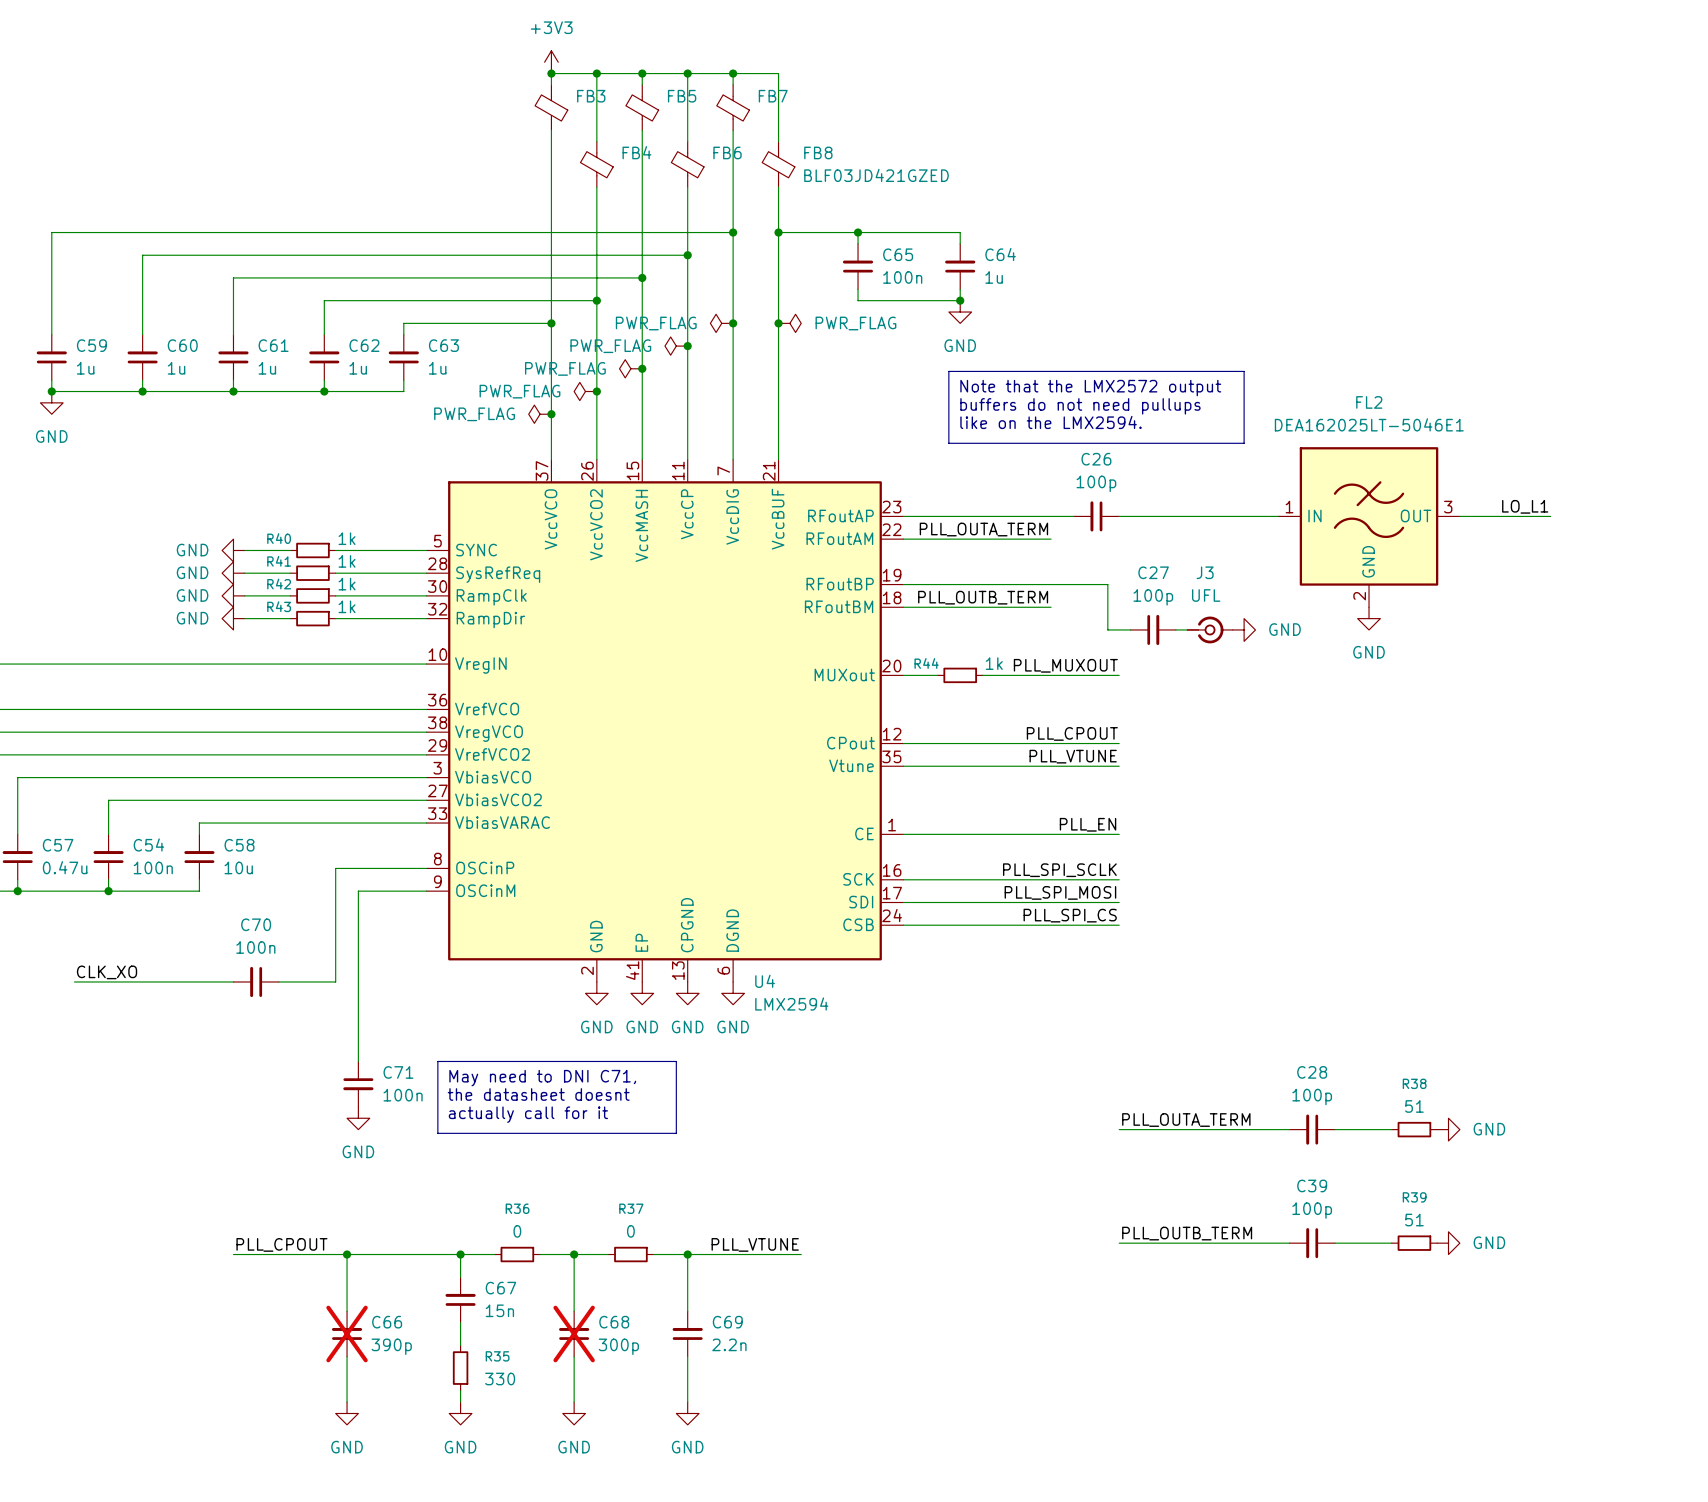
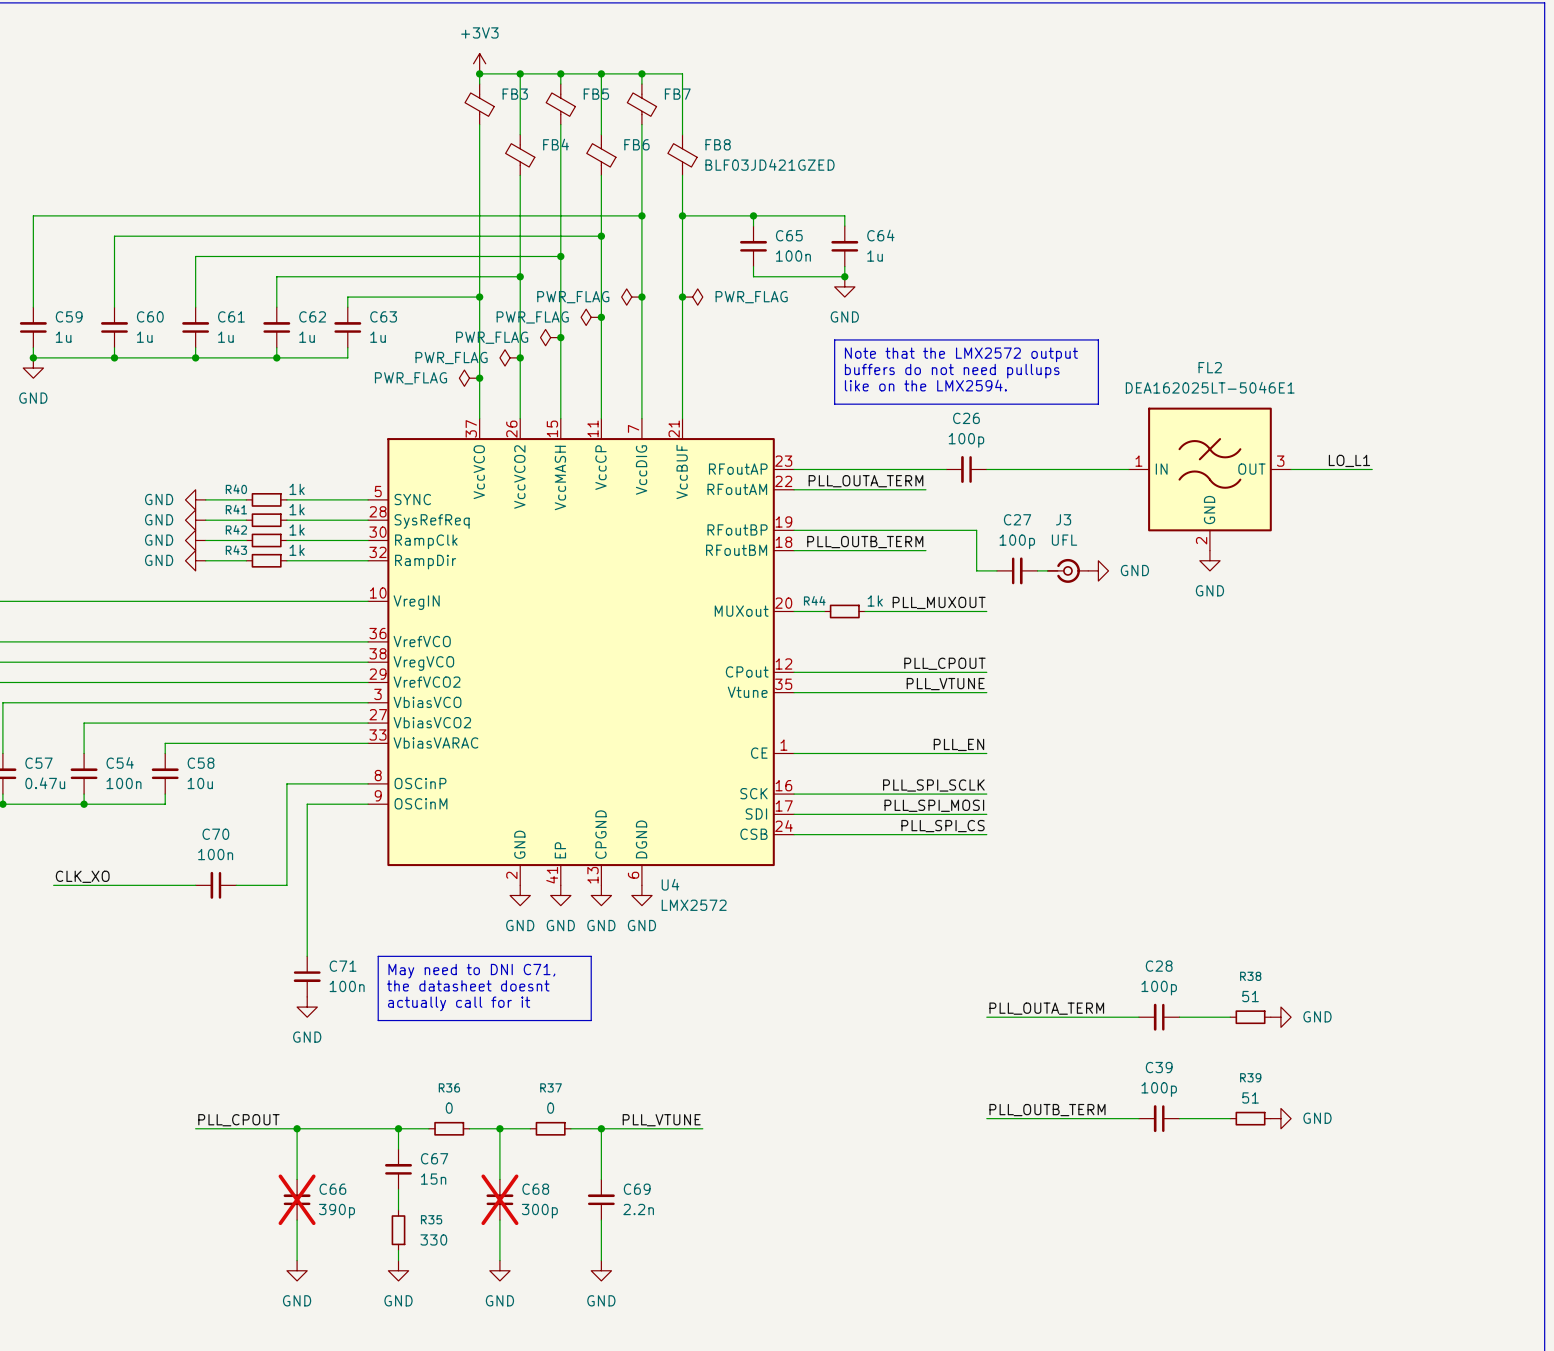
U4 value: LMX2594 (791, 1004) -> LMX2572 (694, 905)

